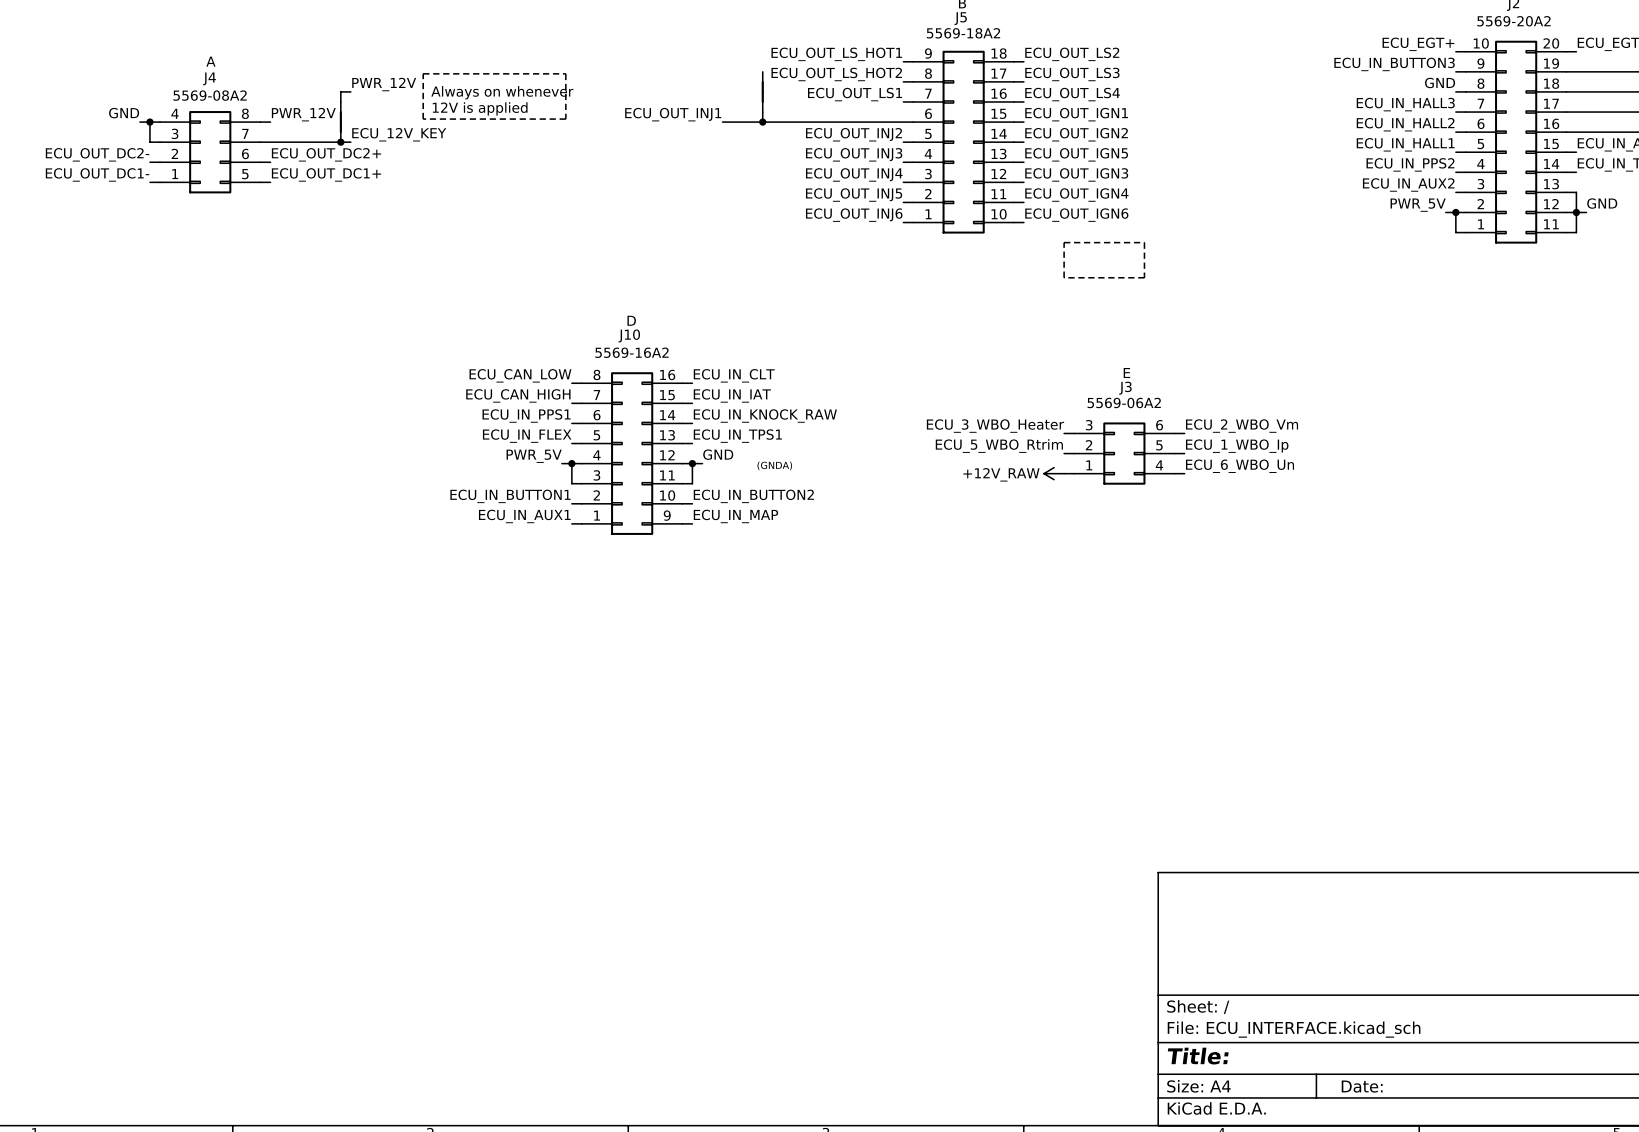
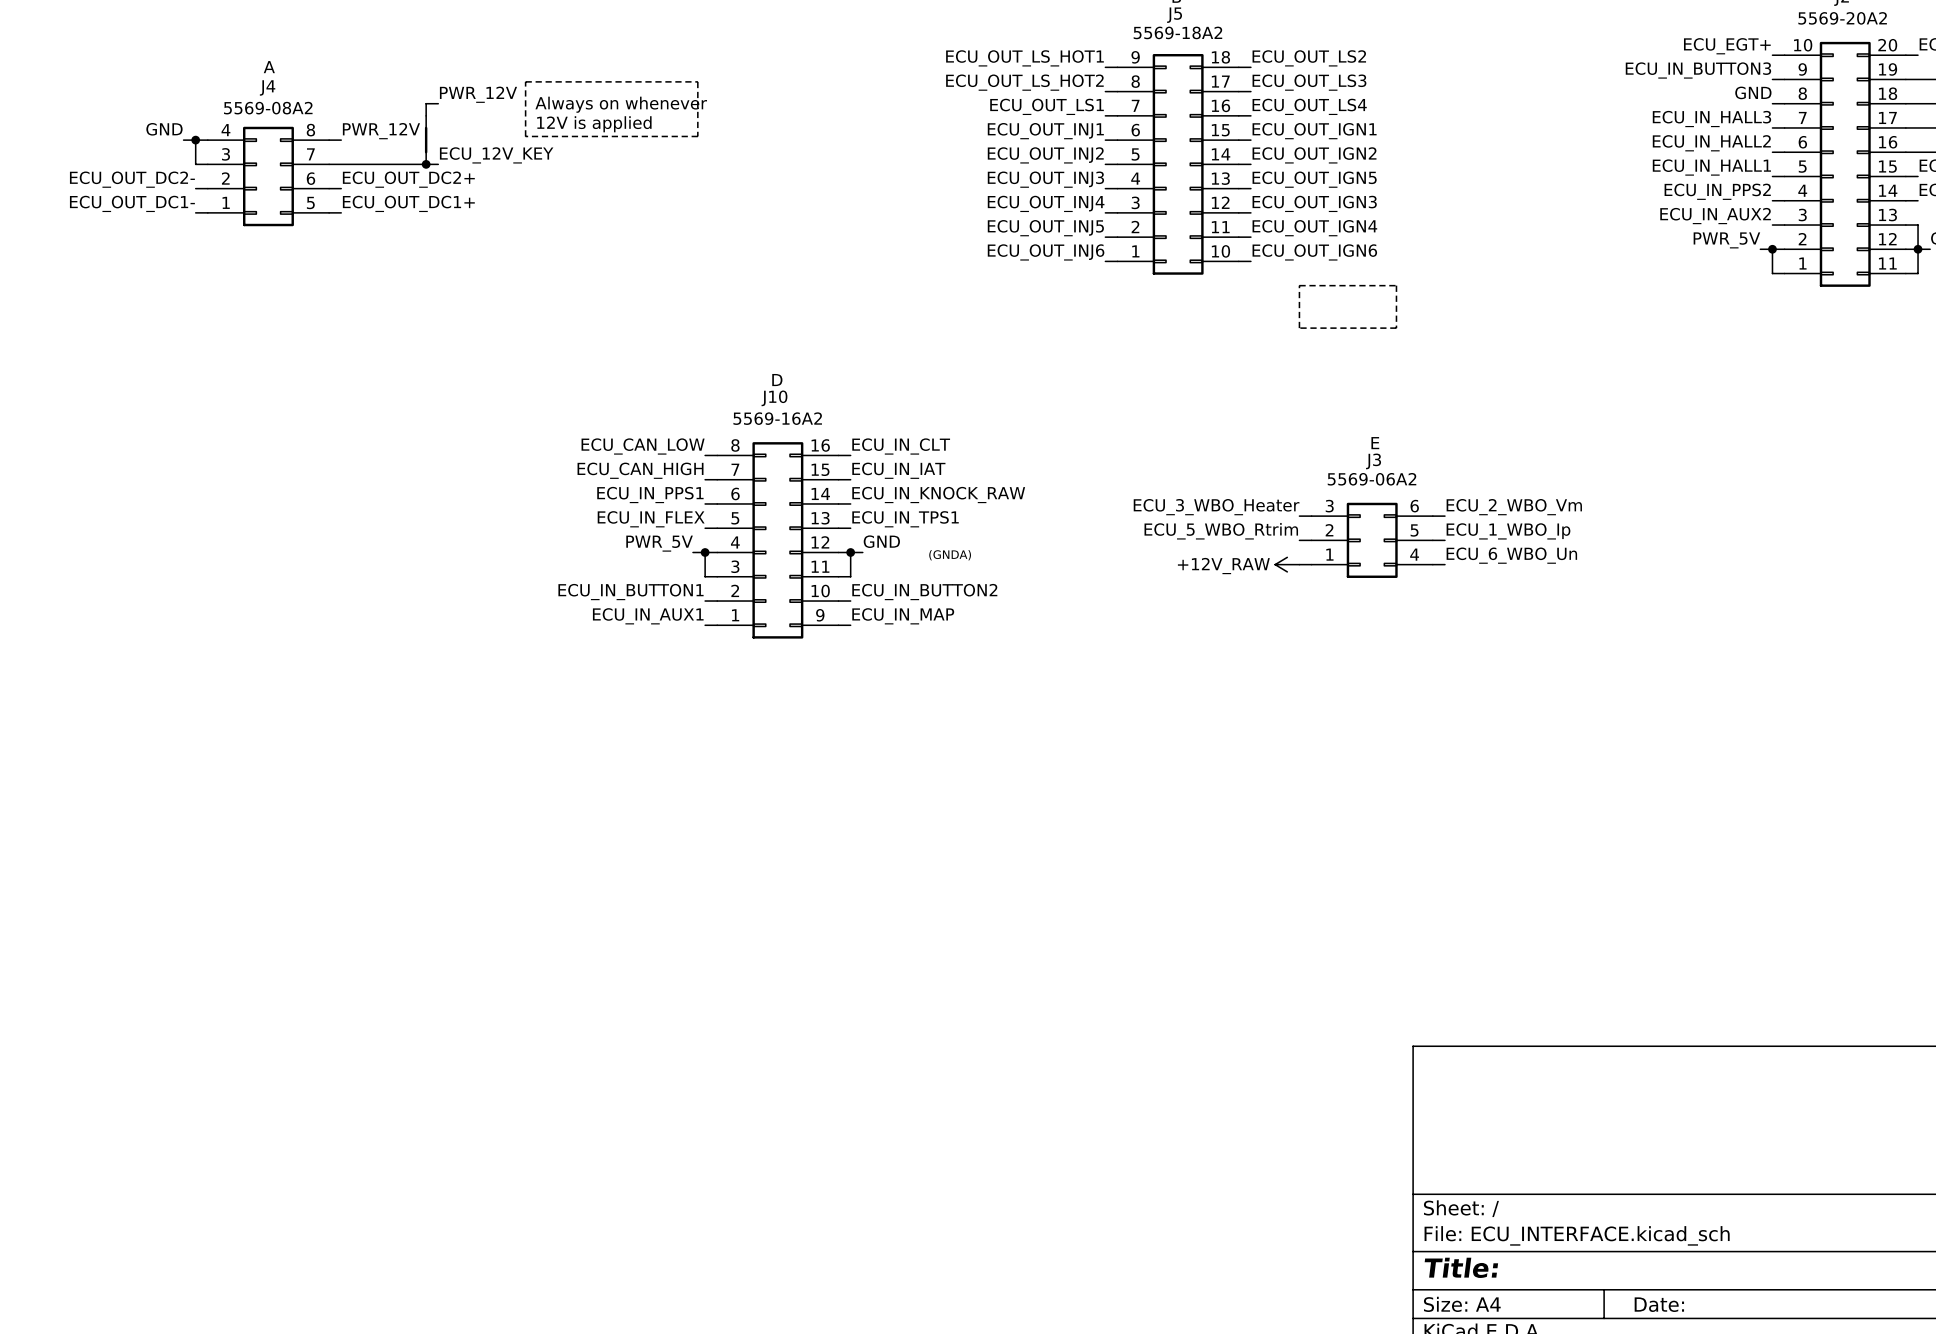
part: (762, 91) -> none
wire: (762, 112) (762, 122) -> none
label position: ECU_OUT_INJ1 (673, 114) -> ECU_OUT_INJ1 (1045, 131)
wire: (722, 122) (903, 122) -> none
junction: (762, 122) -> none

